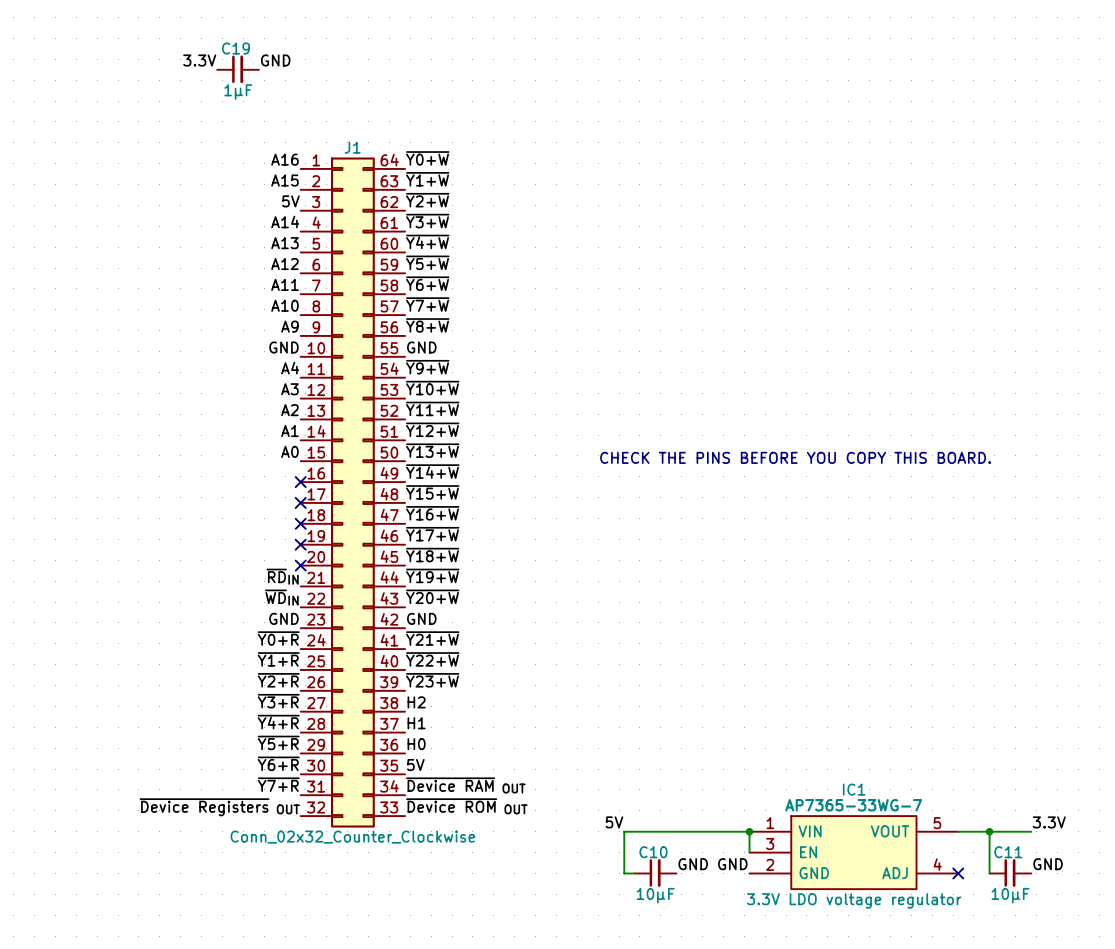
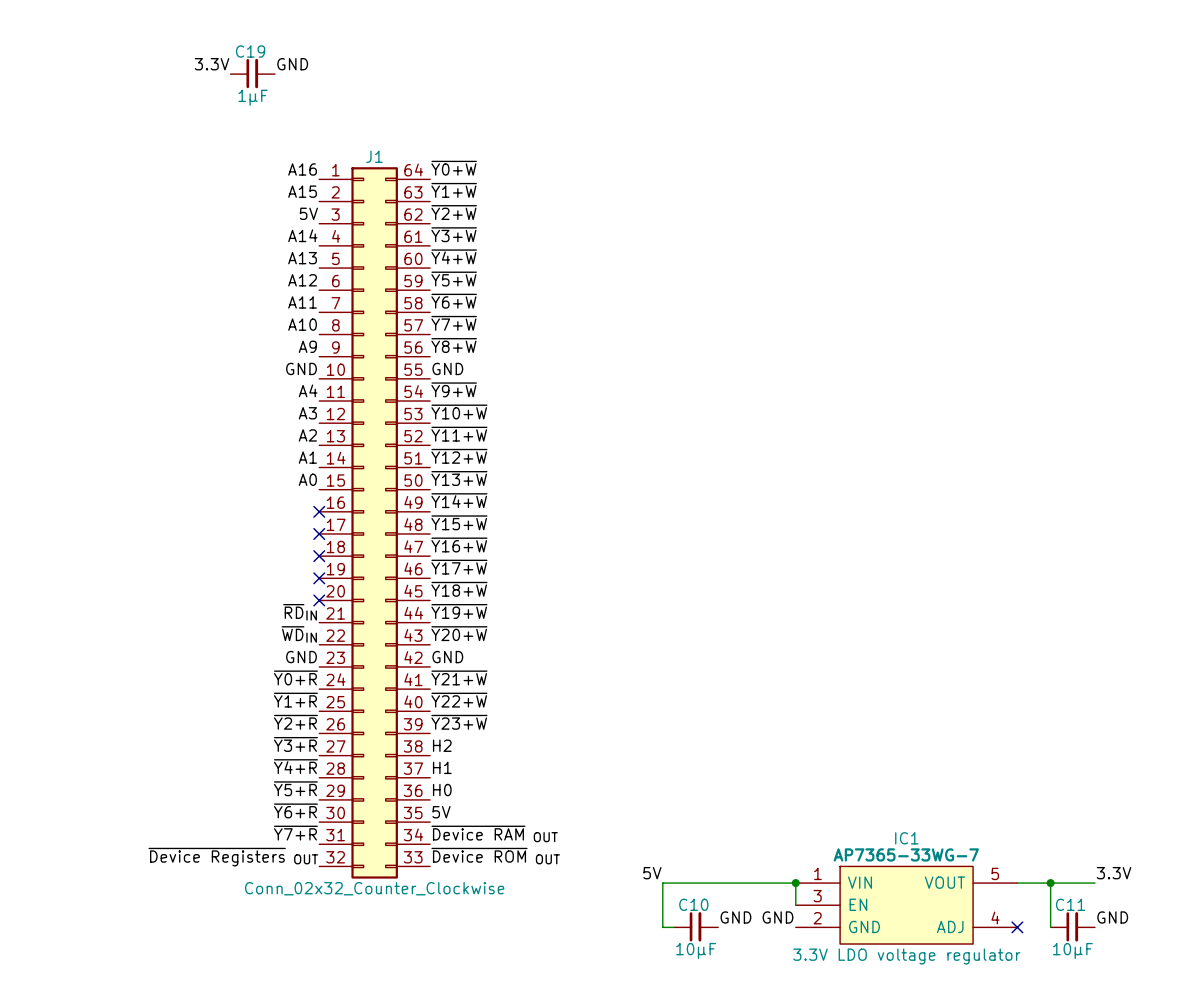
text: CHECK THE PINS BEFORE YOU COPY THIS BOARD. (795, 457) -> none

